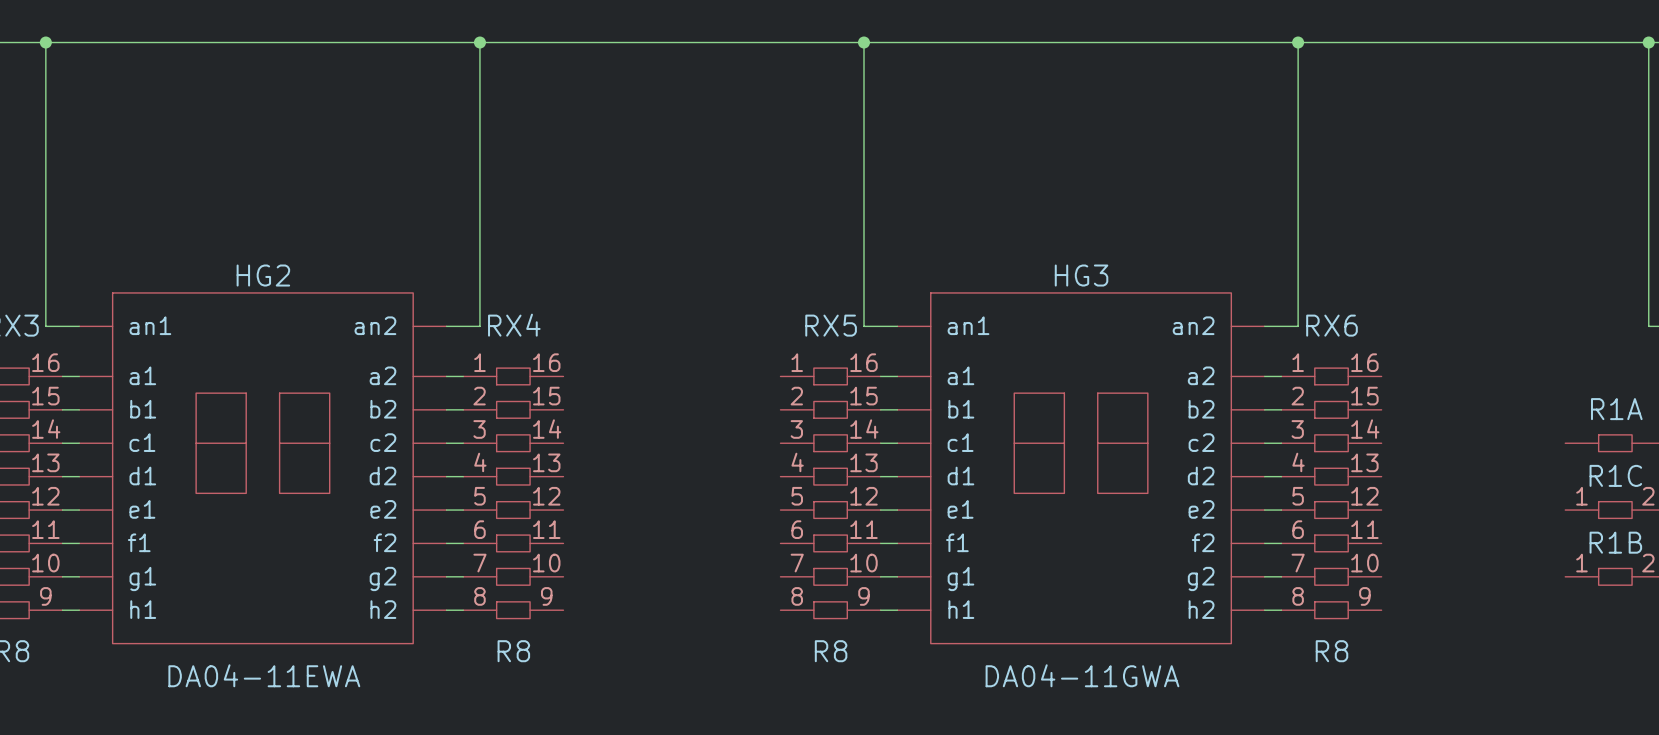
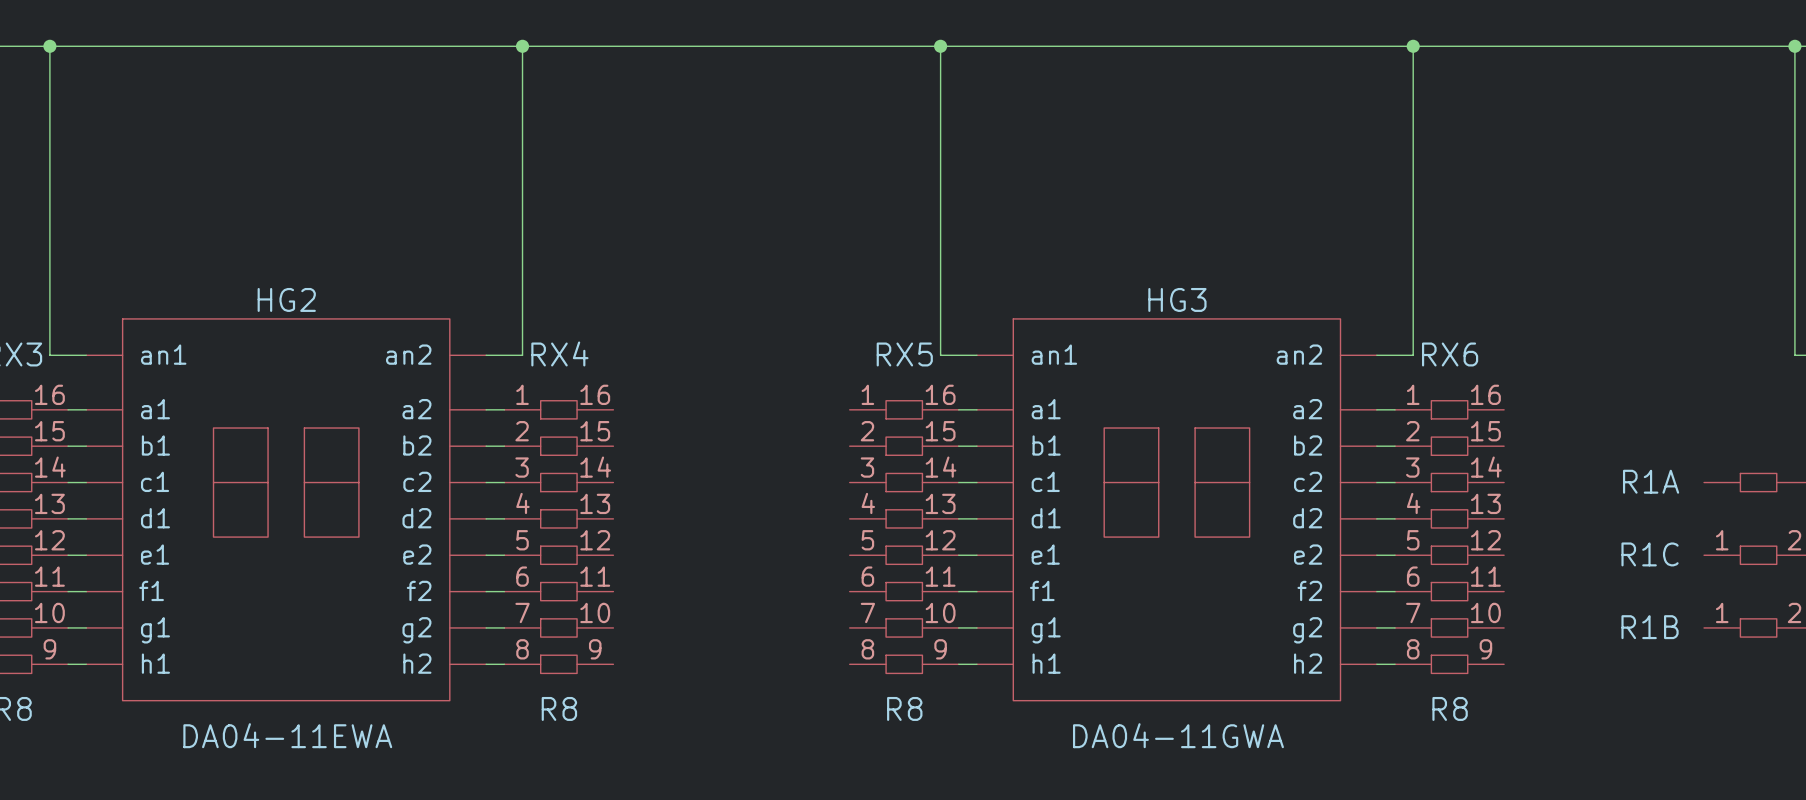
R1A name position: R1A (1616, 409) -> R1A (1651, 481)
R1C name position: R1C (1615, 475) -> R1C (1650, 554)
R1B name position: R1B (1615, 542) -> R1B (1650, 627)

